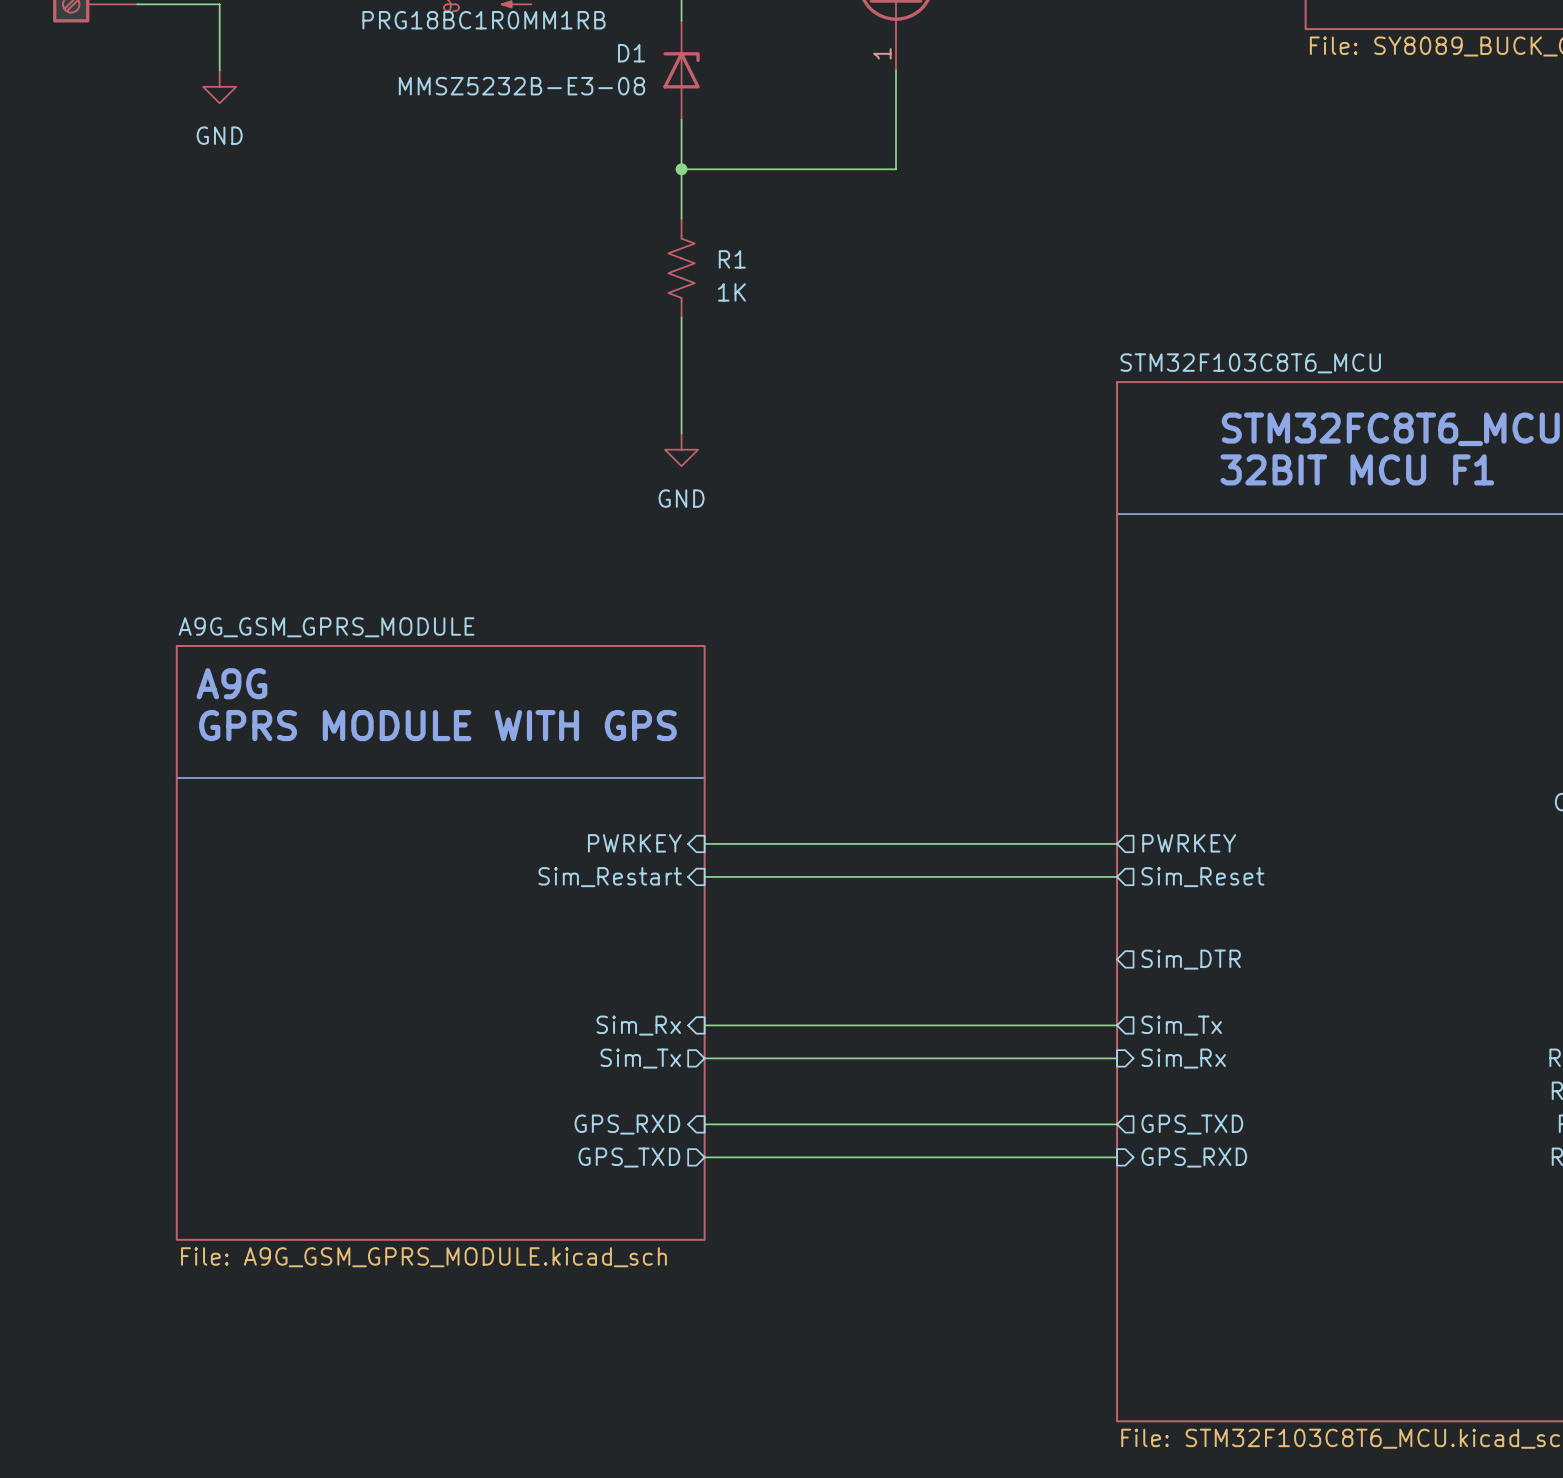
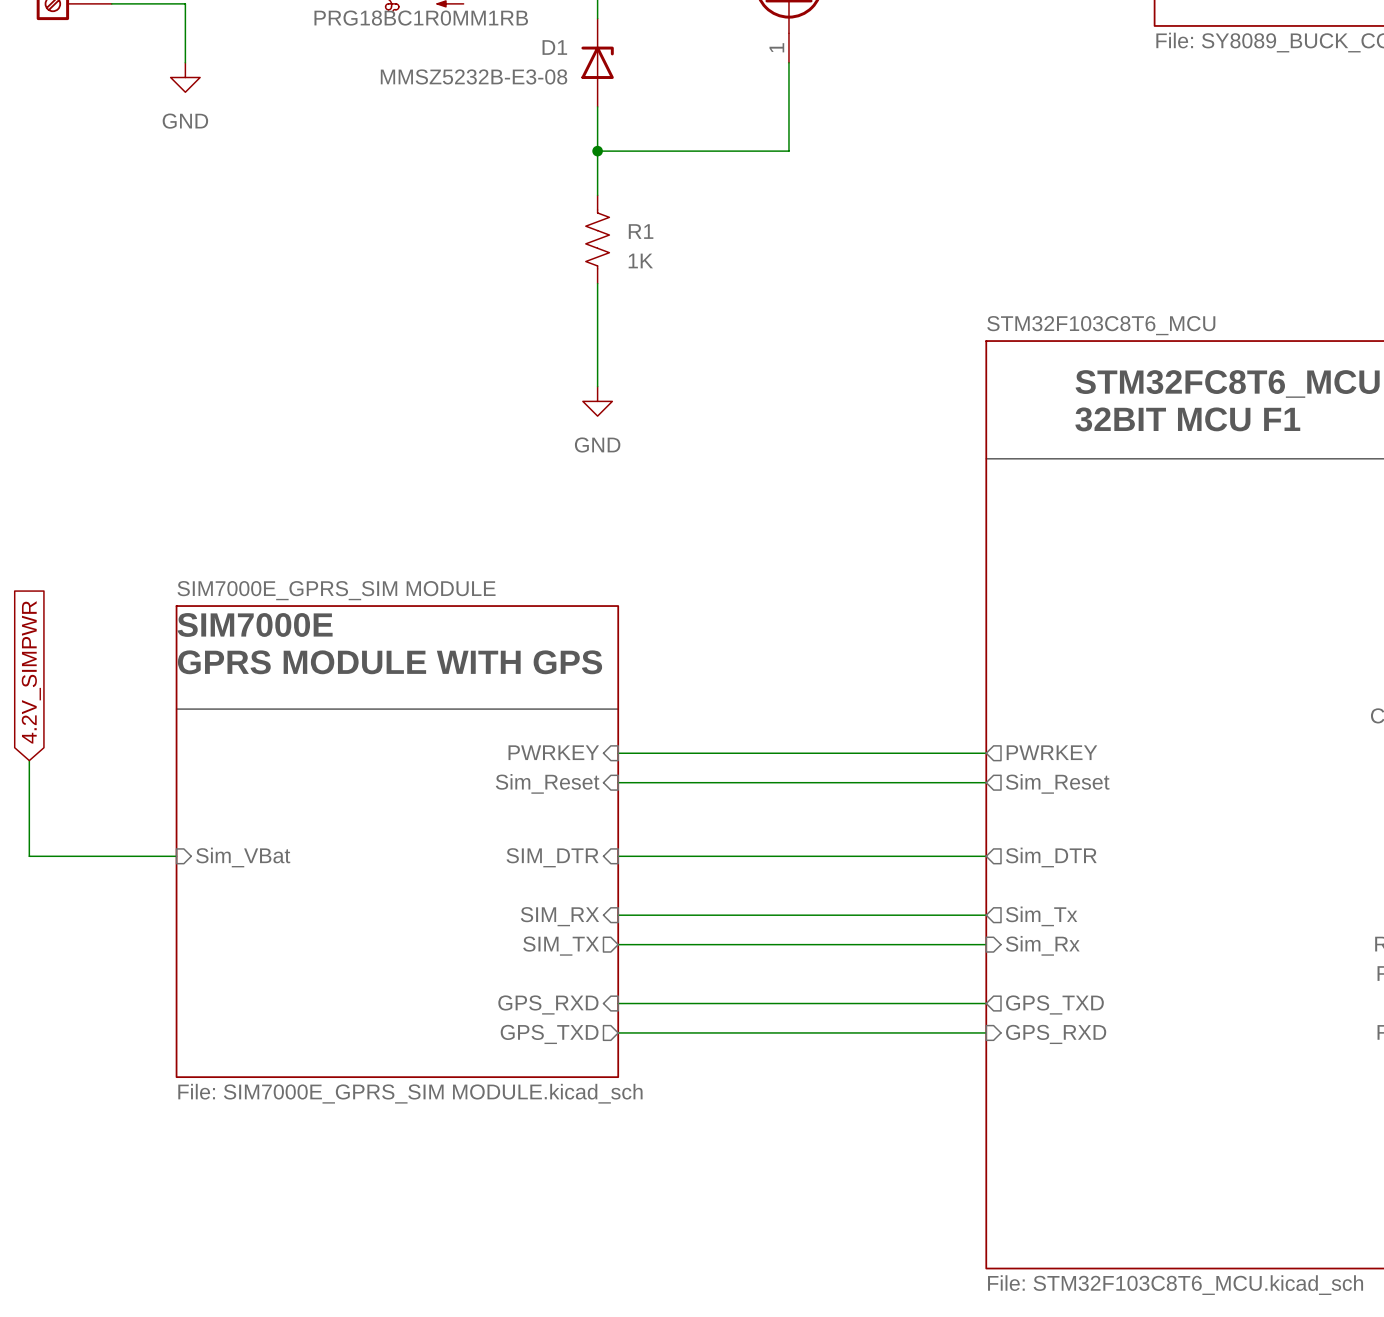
text: A9G (231, 683) -> none
text: none -> SIM7000E (255, 624)
text position: GPRS MODULE WITH GPS (437, 725) -> GPRS MODULE WITH GPS (390, 662)
global label: none -> 4.2V_SIMPWR (31, 672)
line: (176, 777) (704, 777) -> none
line: none -> (176, 709) (618, 709)
wire: none -> (29, 760) (29, 856) (176, 856)
sheet pin: Sim_Restart (610, 877) -> Sim_Reset (547, 783)
sheet A9G_GSM_GPRS_MODULE: File: A9G_GSM_GPRS_MODULE.kicad_sch (440, 942) -> none
sheet SIM7000E_GPRS_SIM MODULE: none -> File: SIM7000E_GPRS_SIM MODULE.kicad_sch (397, 841)
sheet pin: none -> Sim_VBat (243, 857)
sheet pin: none -> SIM_DTR (552, 857)
wire: none -> (618, 856) (986, 856)
sheet pin: Sim_Rx (638, 1025) -> SIM_RX (559, 916)
sheet pin: Sim_Tx (640, 1058) -> SIM_TX (561, 946)

